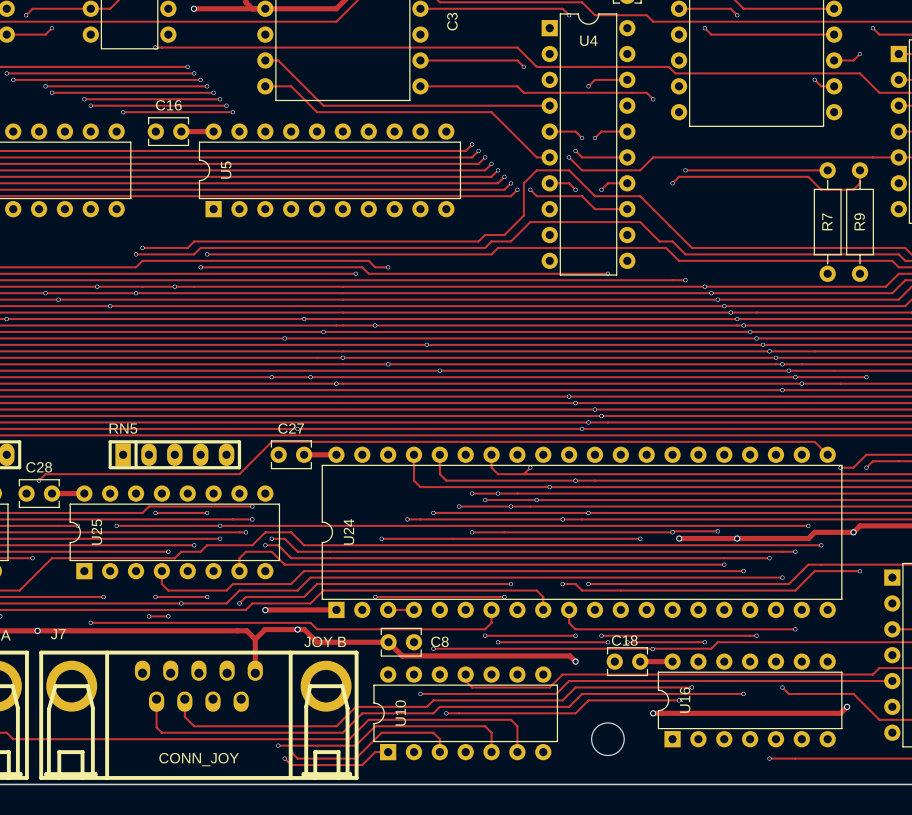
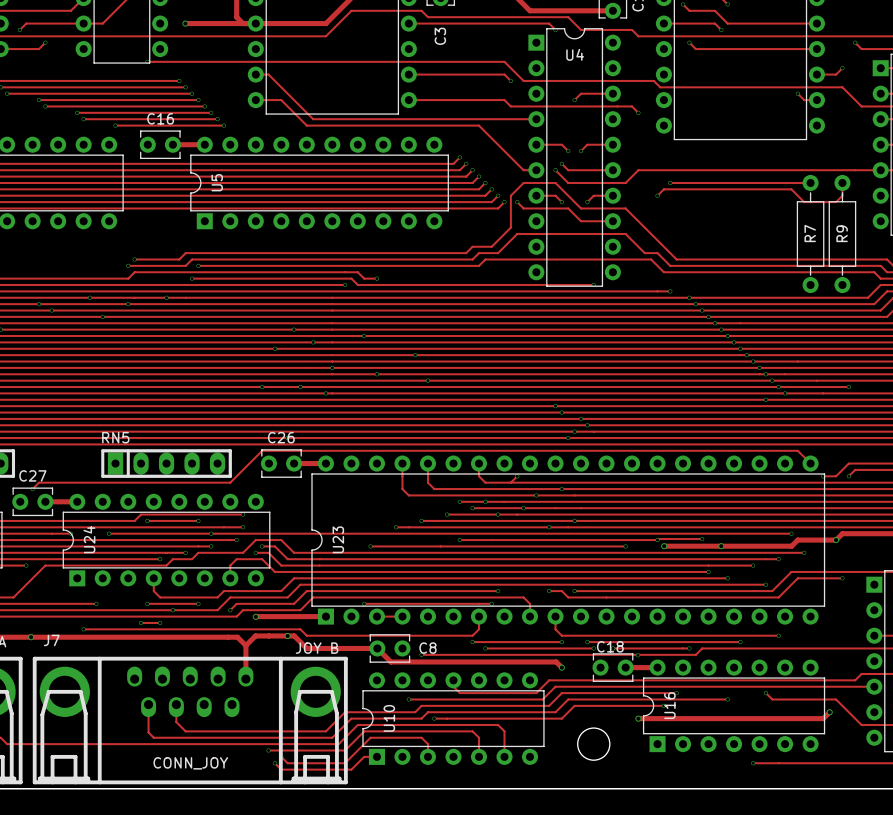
C27 name: C27 (291, 428) -> C26 (281, 437)
C28 name: C28 (39, 467) -> C27 (32, 475)
U24 name: U24 (348, 531) -> U23 (338, 539)
U25 name: U25 (96, 532) -> U24 (89, 539)

